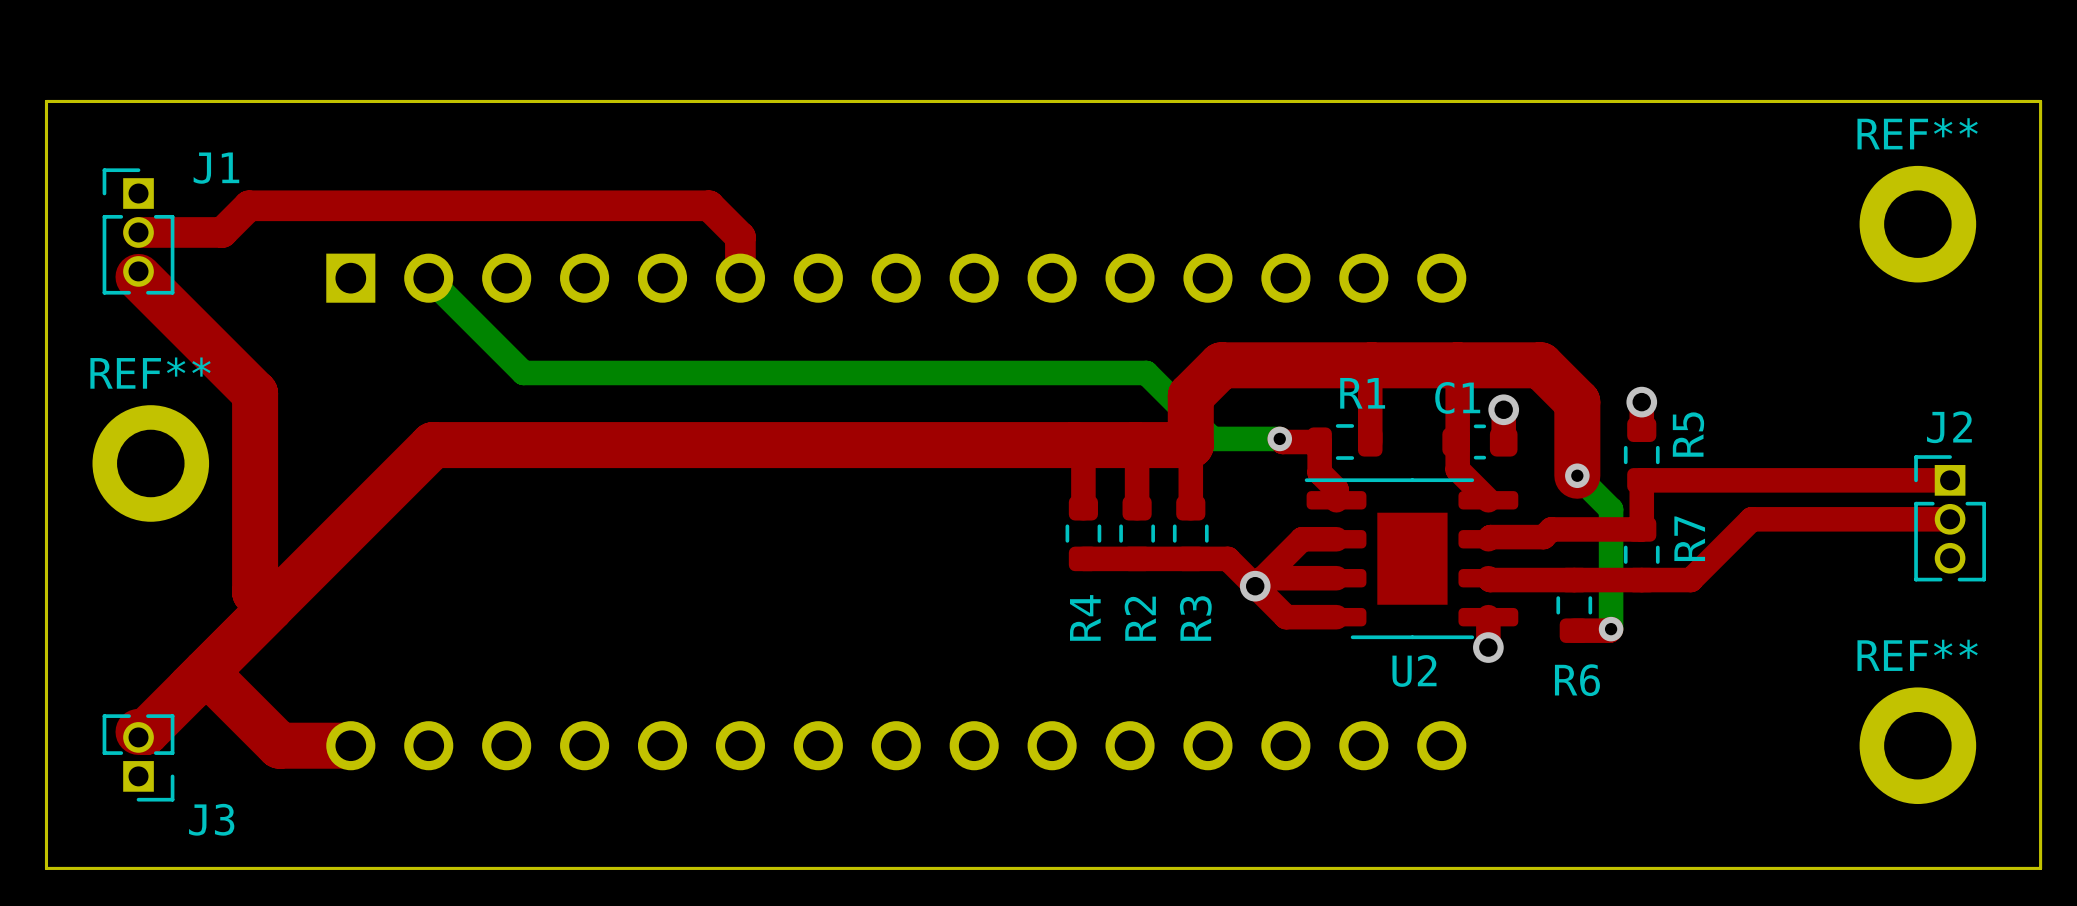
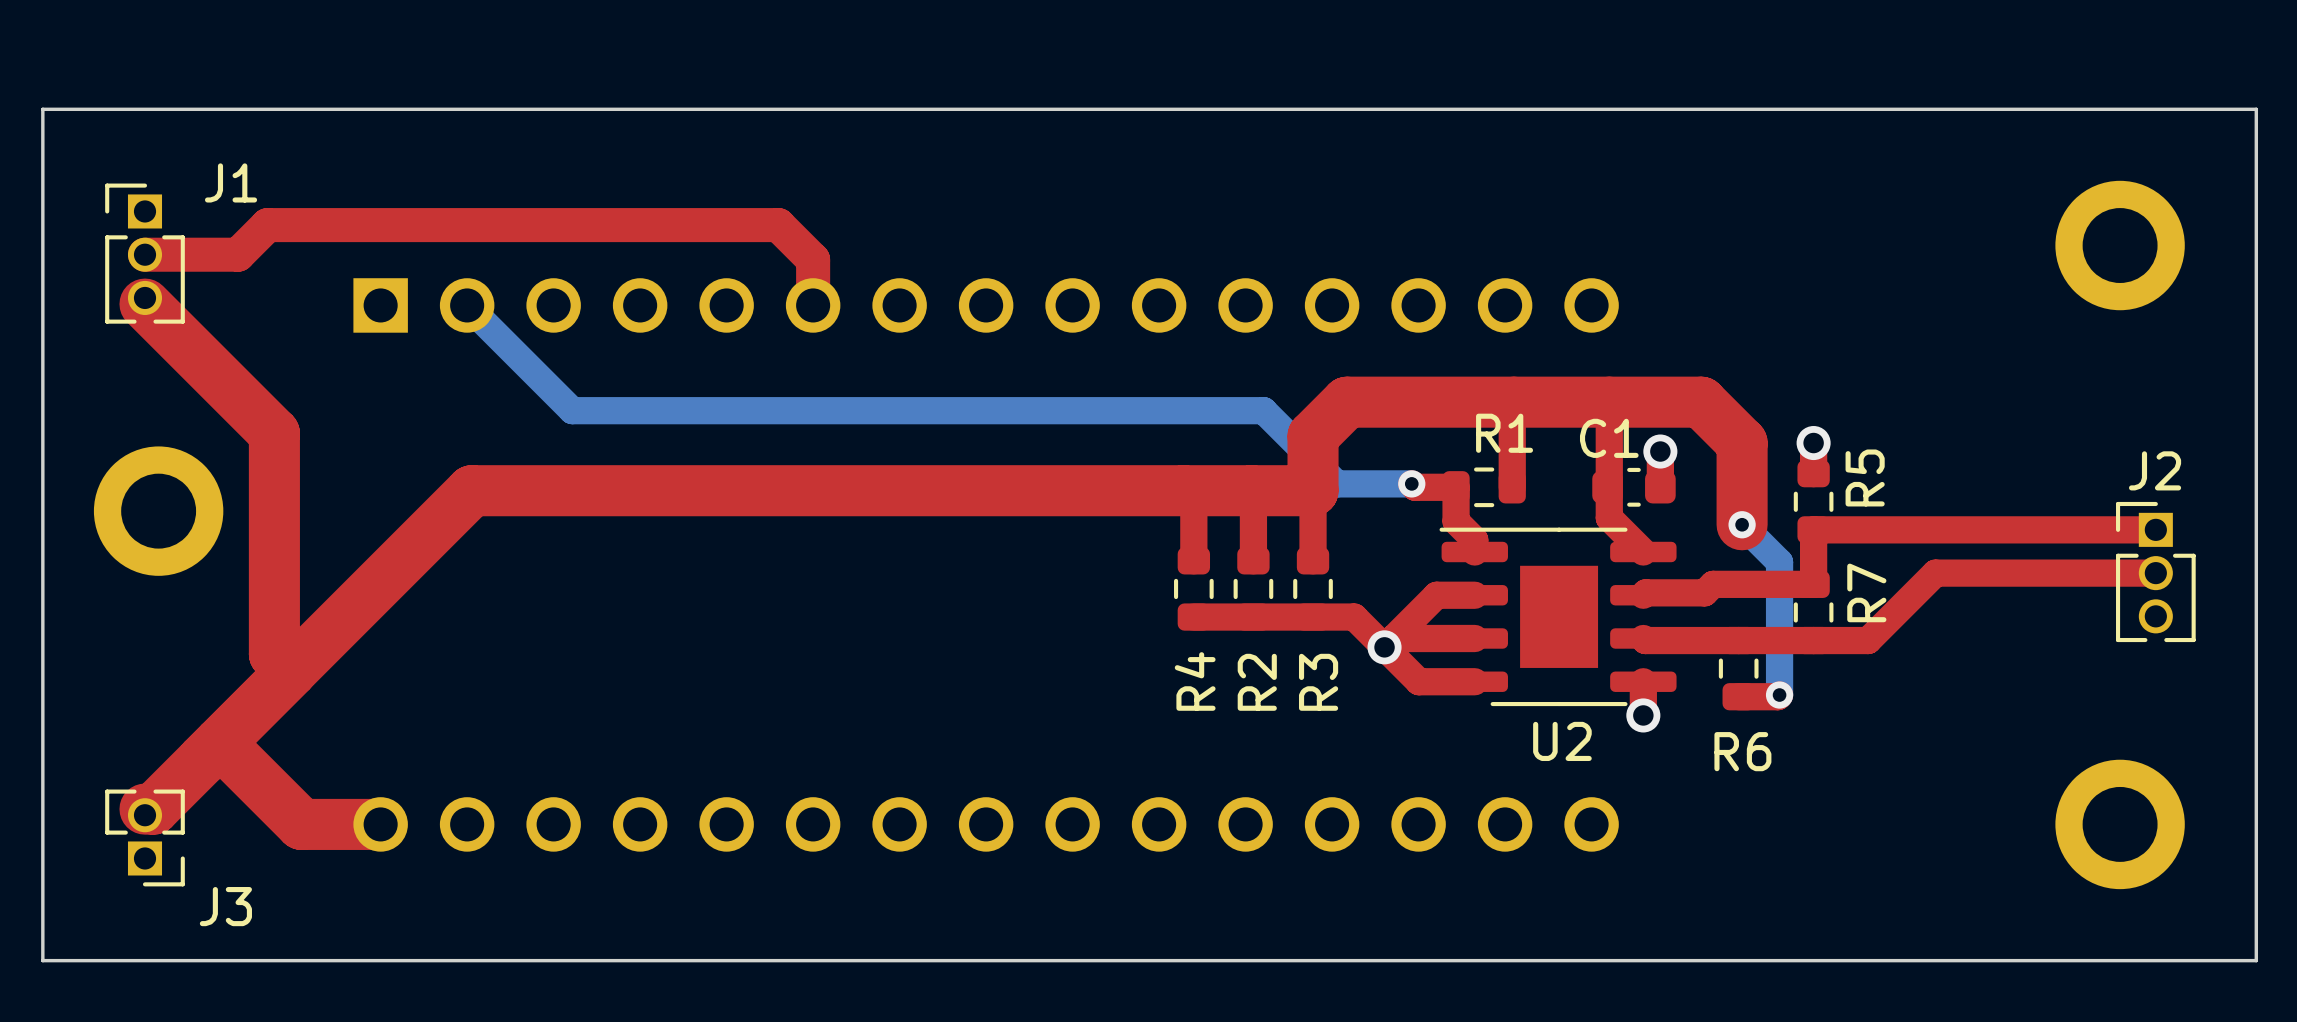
REF** name: REF** (1917, 133) -> none
REF** name: REF** (150, 373) -> none
REF** name: REF** (1917, 655) -> none

